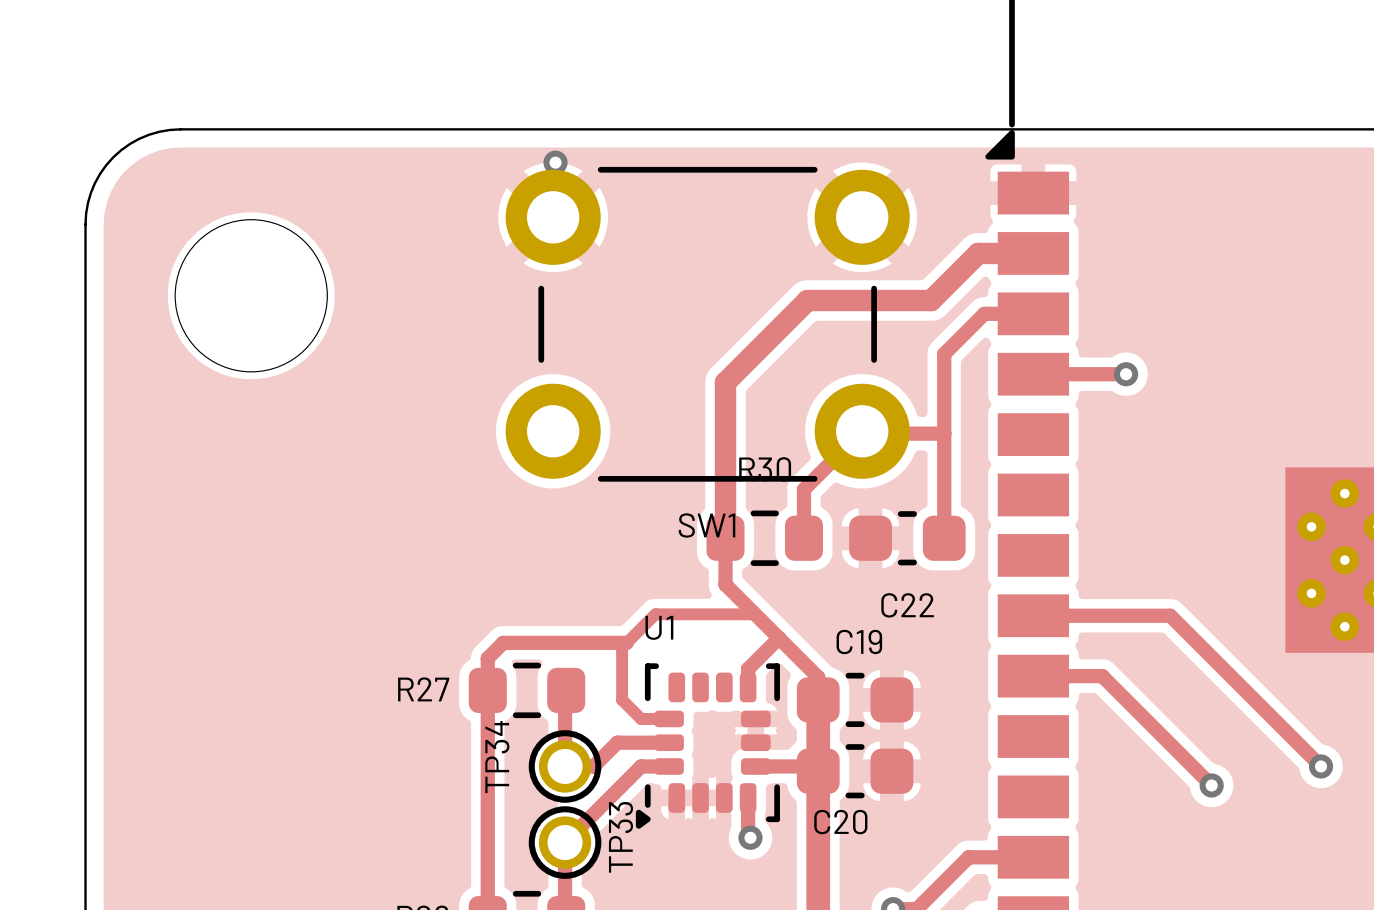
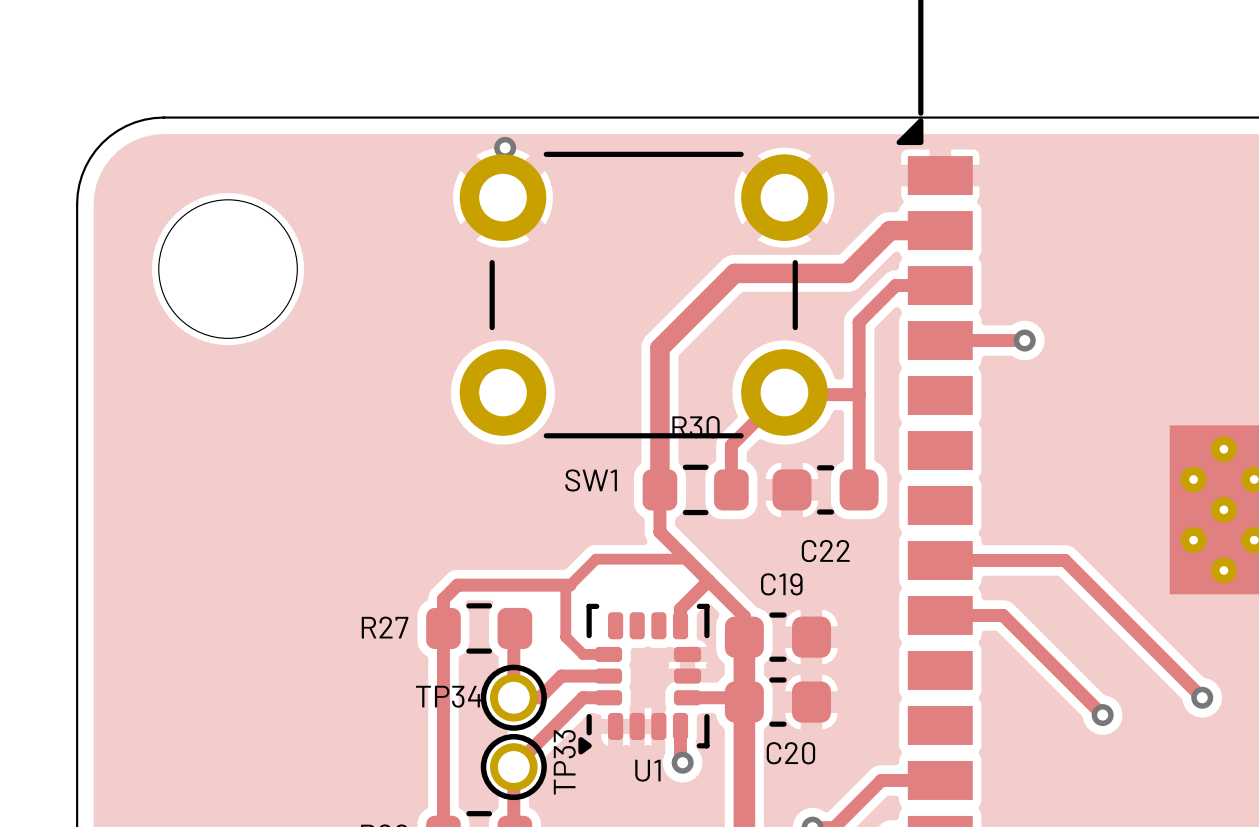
SW1 name position: SW1 (706, 525) -> SW1 (591, 480)
U1 name position: U1 (659, 627) -> U1 (647, 770)
TP34 name rotation: 0° (497, 757) -> 90° clockwise (448, 696)
C20 name position: C20 (840, 822) -> C20 (790, 753)

